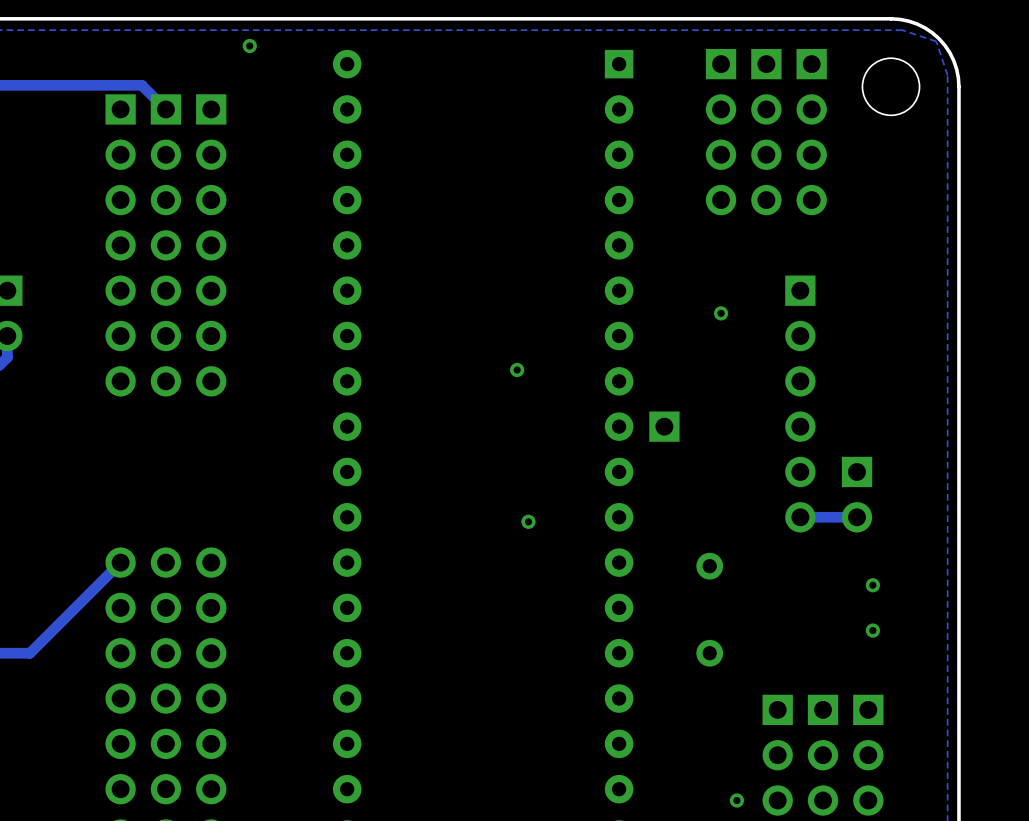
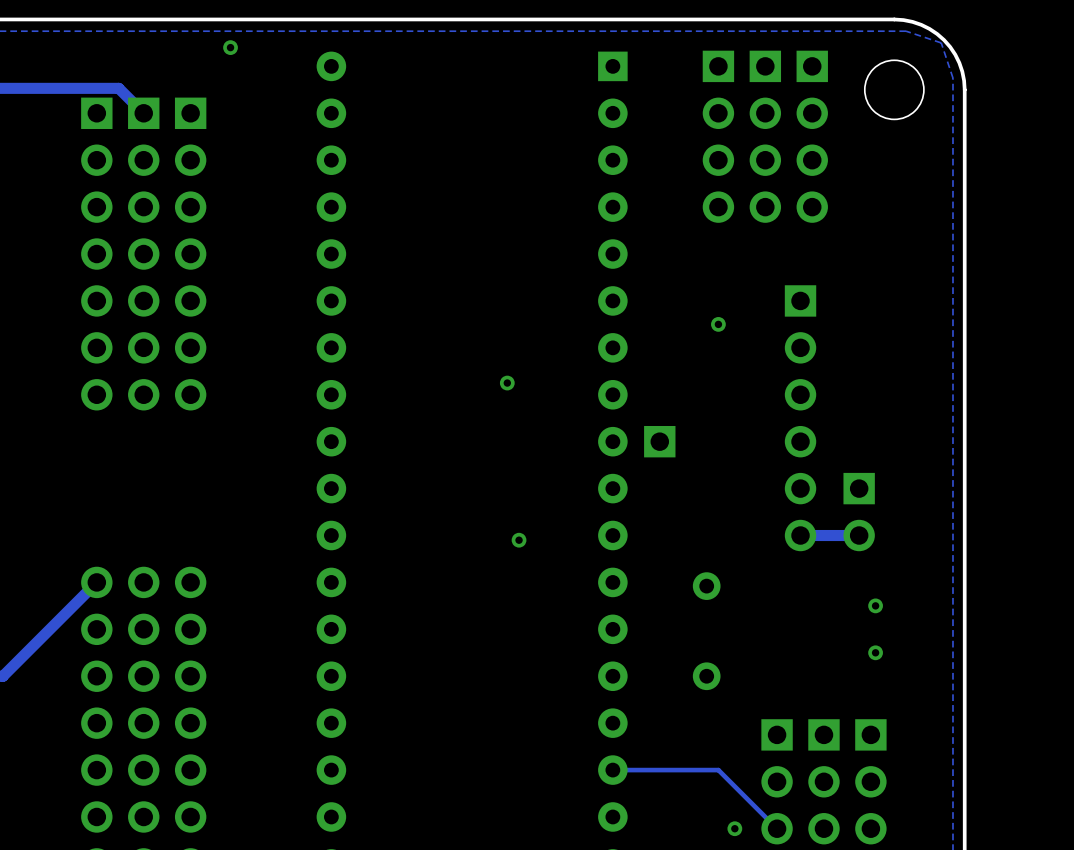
track: none -> (612, 770) (718, 770) (777, 828)

